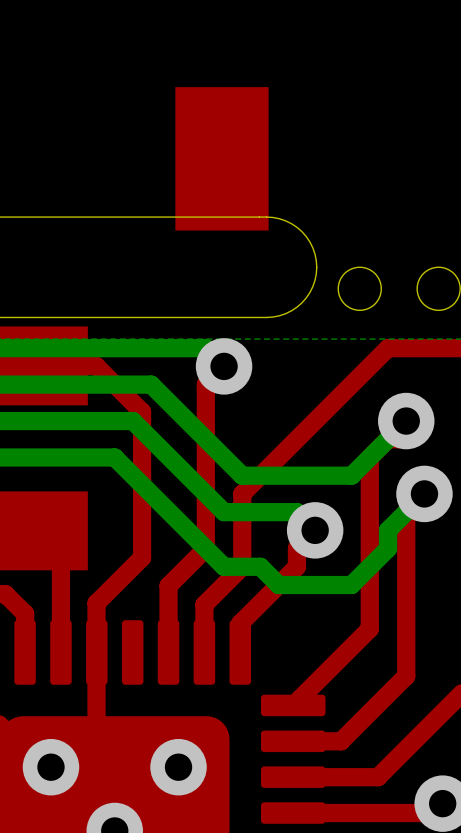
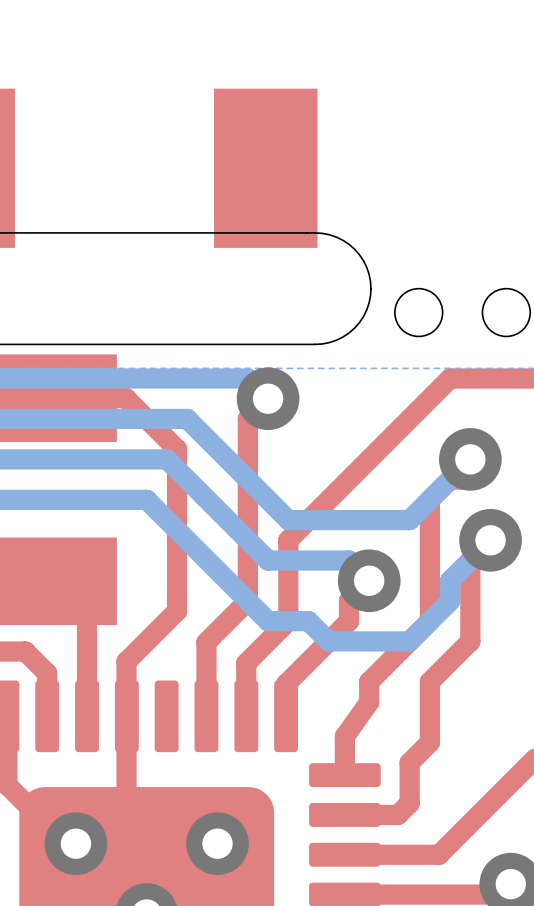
top track: (369, 566) (369, 621) -> (470, 641) (429, 681)
top track: (406, 585) (406, 676) (351, 730) -> (429, 690) (429, 742) (409, 762) (409, 803)
top track: (369, 628) (293, 705) -> (429, 621) (369, 681) (369, 702) (344, 736) (344, 775)

